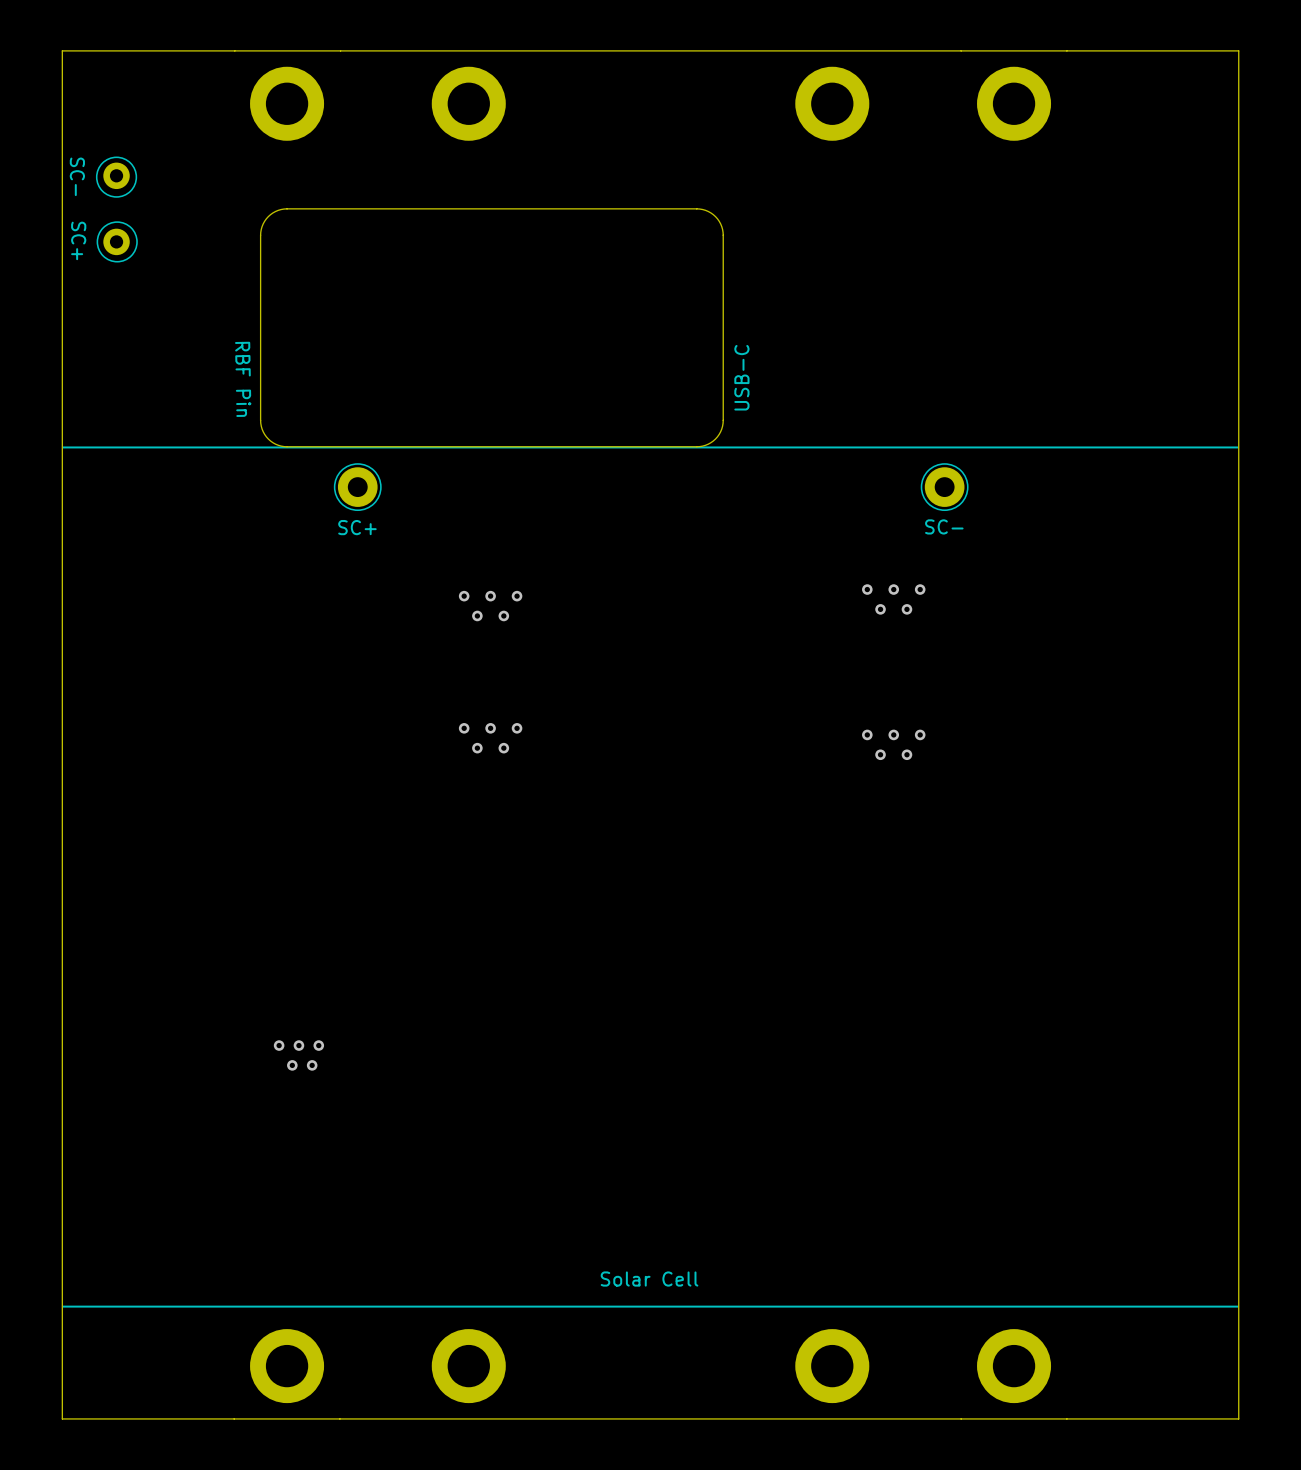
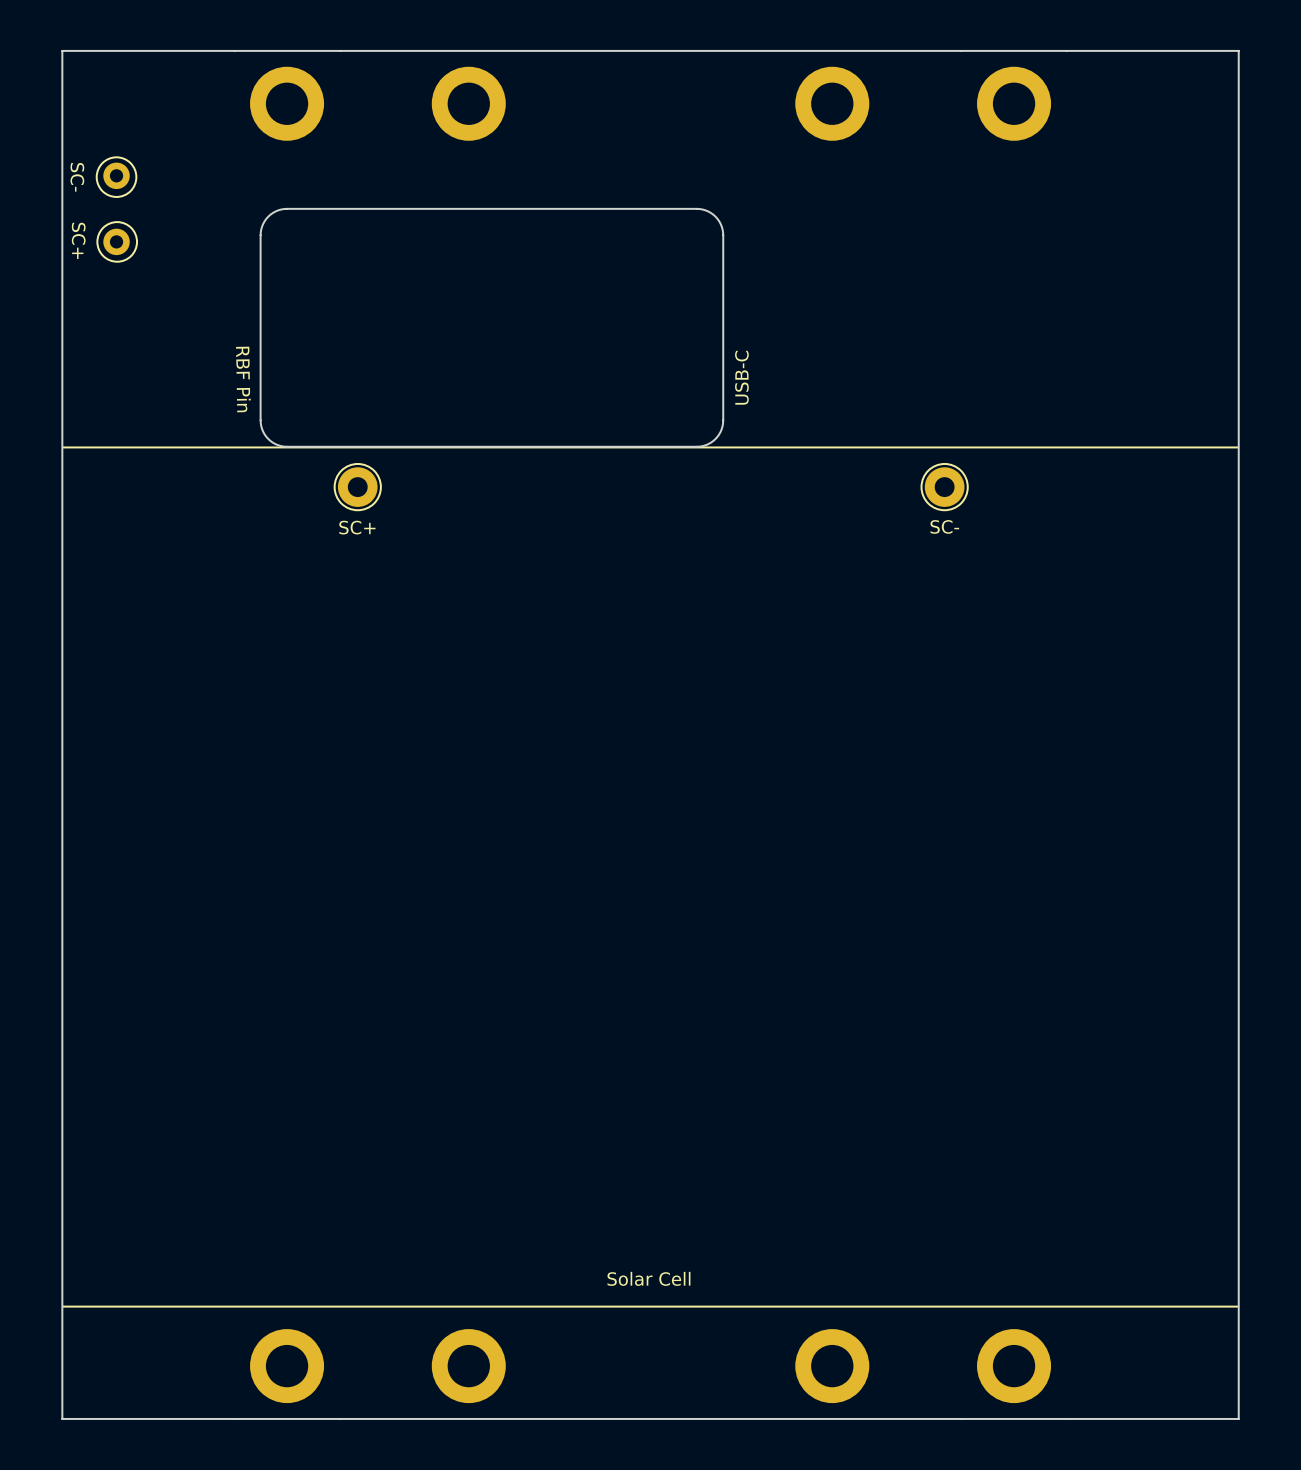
via: (867, 589) -> none
via: (893, 589) -> none
via: (920, 589) -> none
via: (464, 596) -> none
via: (490, 596) -> none
via: (517, 596) -> none
via: (880, 609) -> none
via: (906, 609) -> none
via: (477, 615) -> none
via: (503, 615) -> none
via: (464, 728) -> none
via: (490, 728) -> none
via: (517, 728) -> none
via: (867, 734) -> none
via: (893, 734) -> none
via: (920, 734) -> none
via: (477, 748) -> none
via: (503, 748) -> none
via: (880, 754) -> none
via: (906, 754) -> none
via: (279, 1045) -> none
via: (298, 1045) -> none
via: (318, 1045) -> none
via: (292, 1065) -> none
via: (312, 1065) -> none

